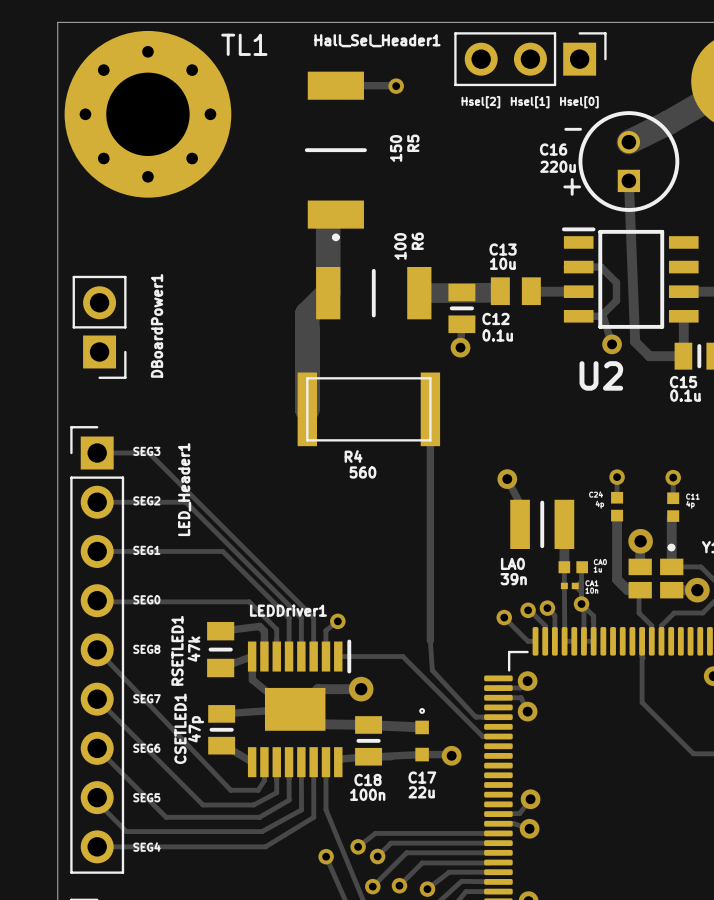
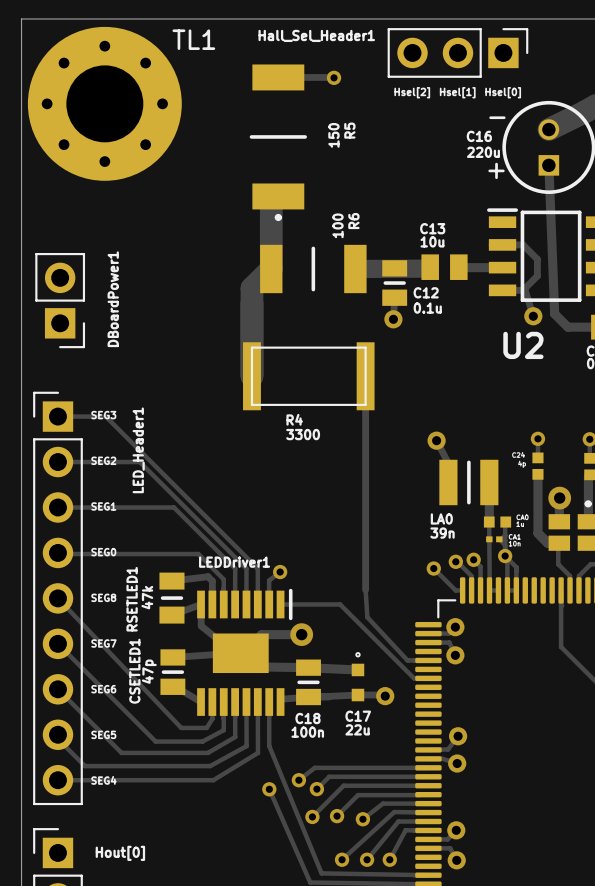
R4 value: 560 (362, 472) -> 3300 (303, 434)

